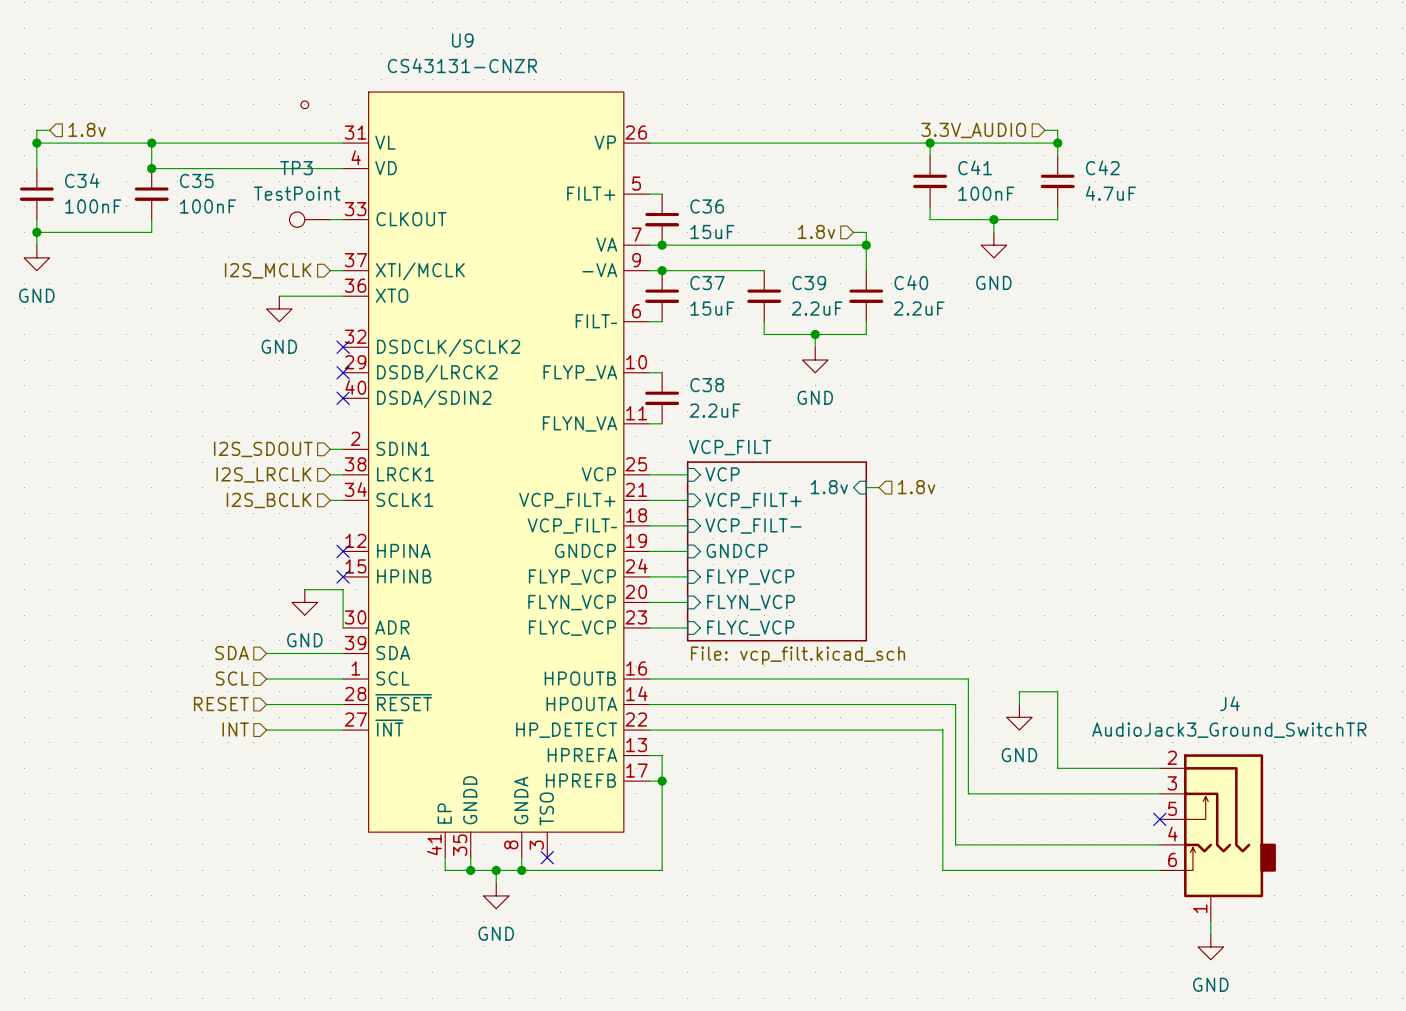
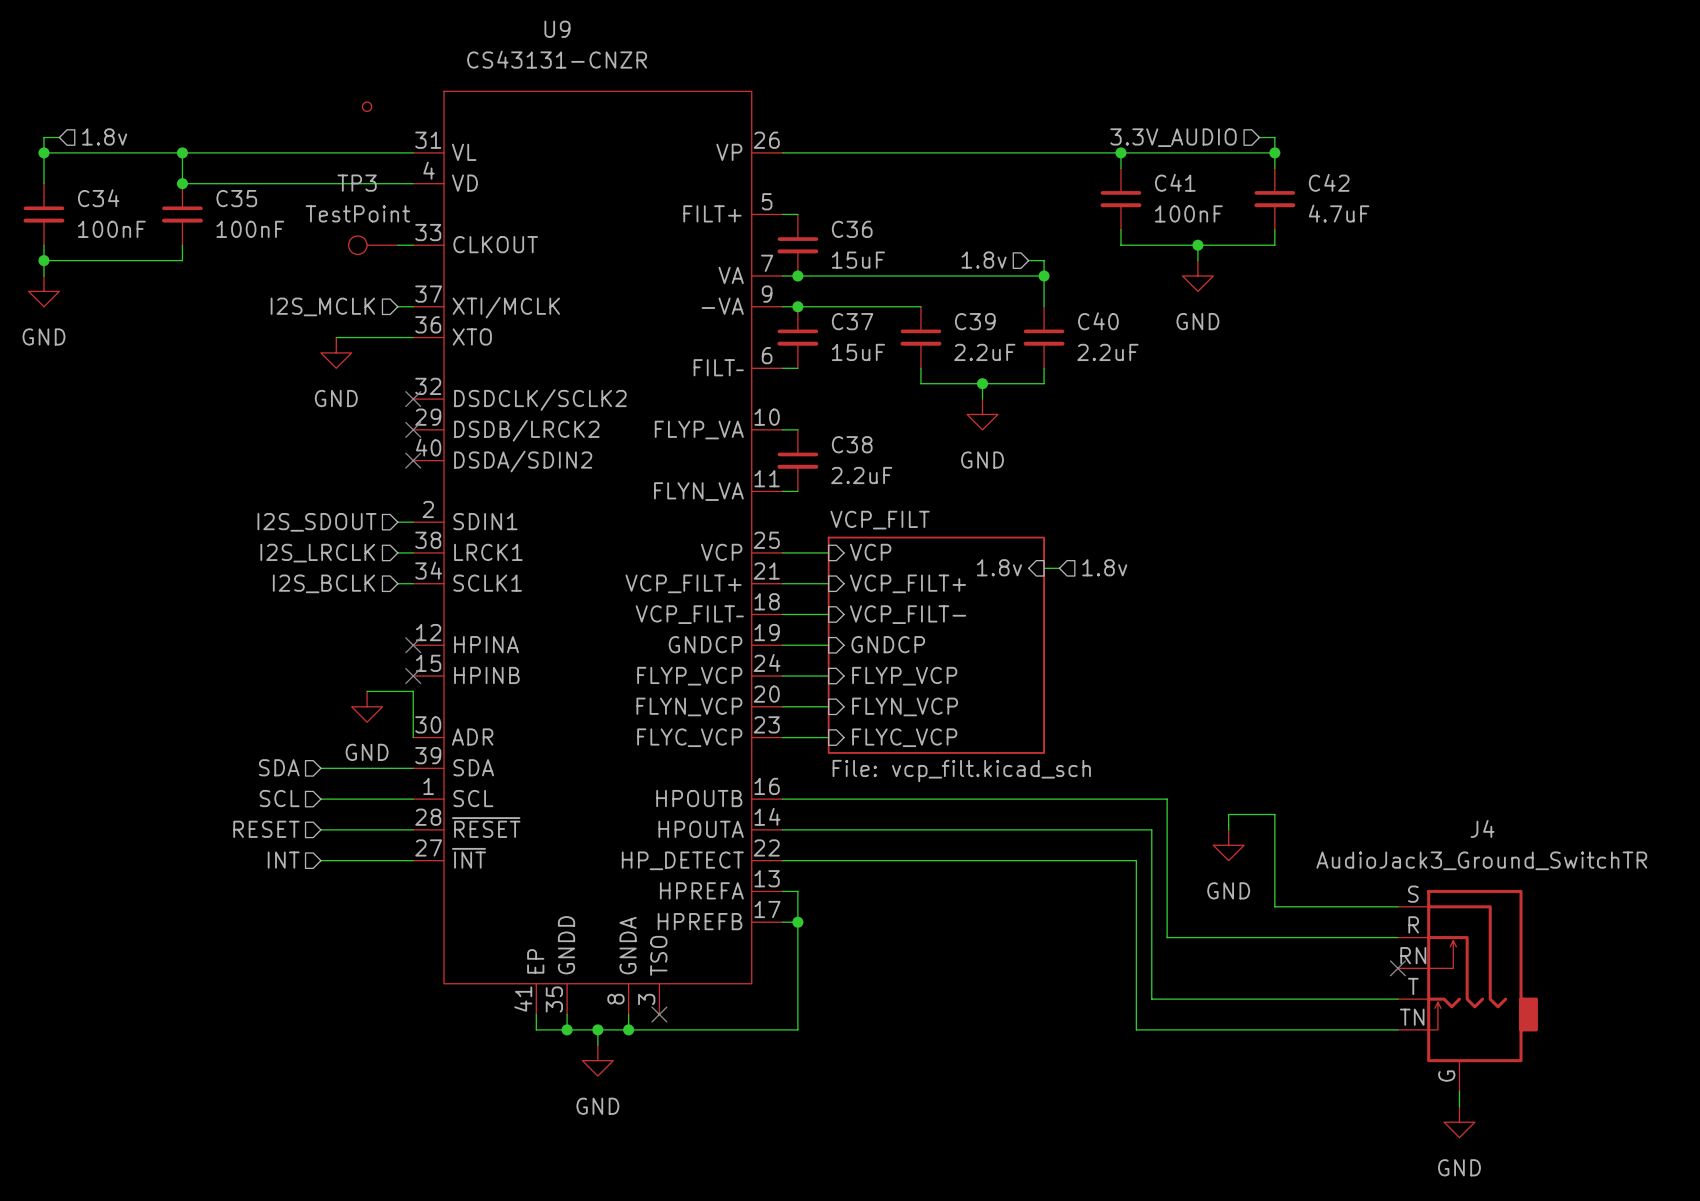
J4 pin number: 2 (1172, 757) -> S (1413, 894)
J4 pin number: 3 (1172, 783) -> R (1413, 924)
J4 pin number: 5 (1172, 808) -> RN (1413, 955)
J4 pin number: 4 (1172, 834) -> T (1413, 986)
J4 pin number: 6 (1172, 859) -> TN (1412, 1017)
J4 pin number: 1 (1200, 908) -> G (1446, 1076)

